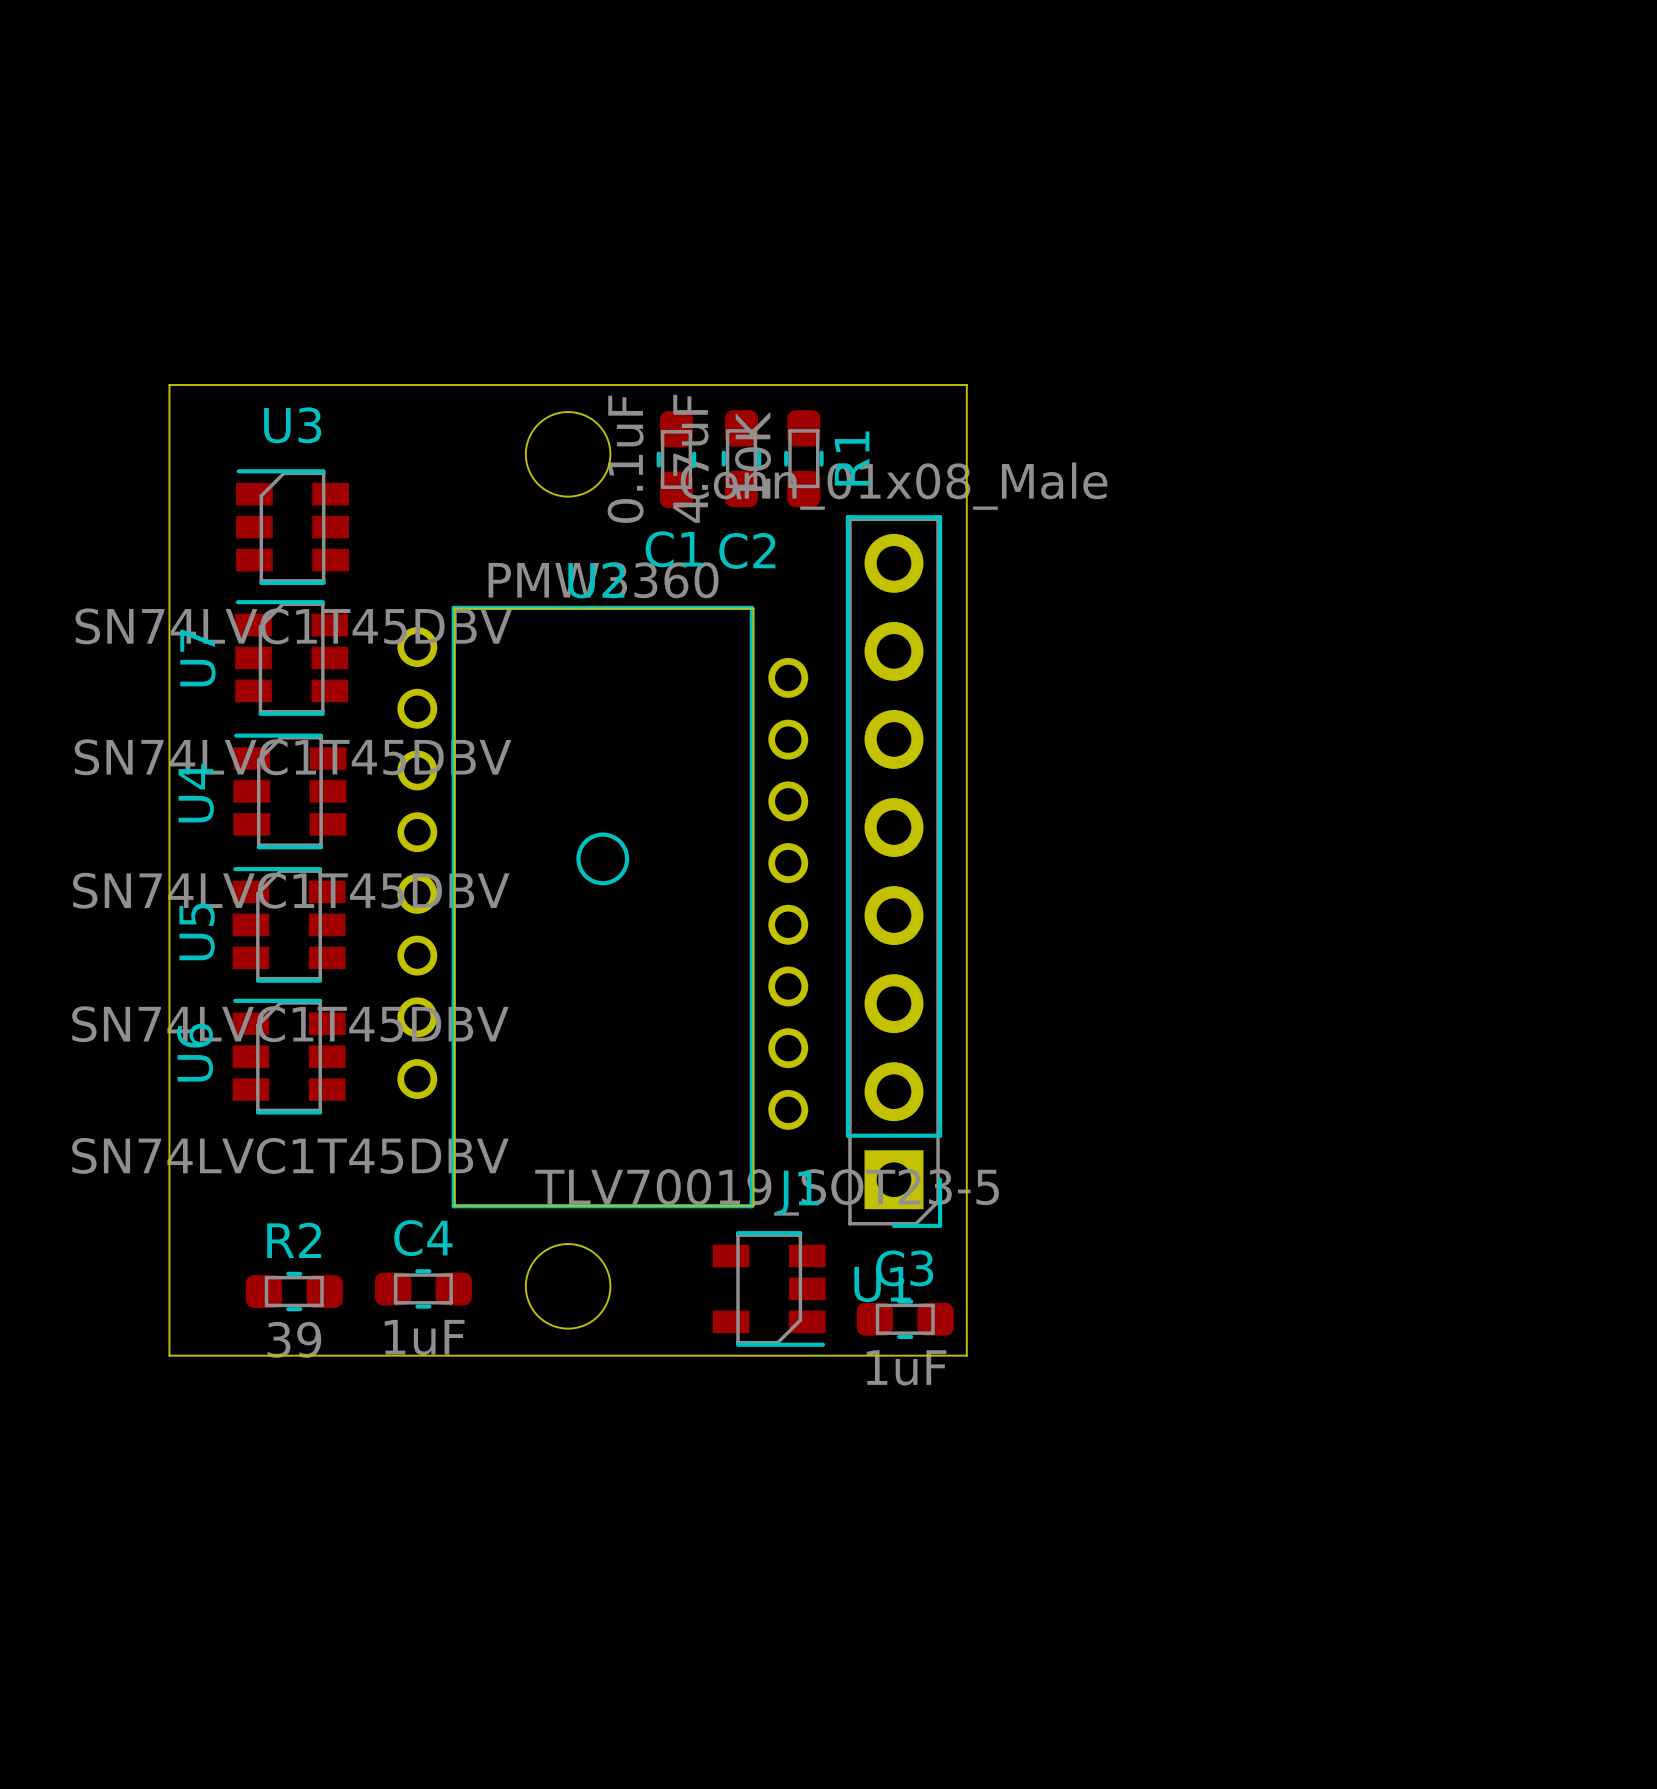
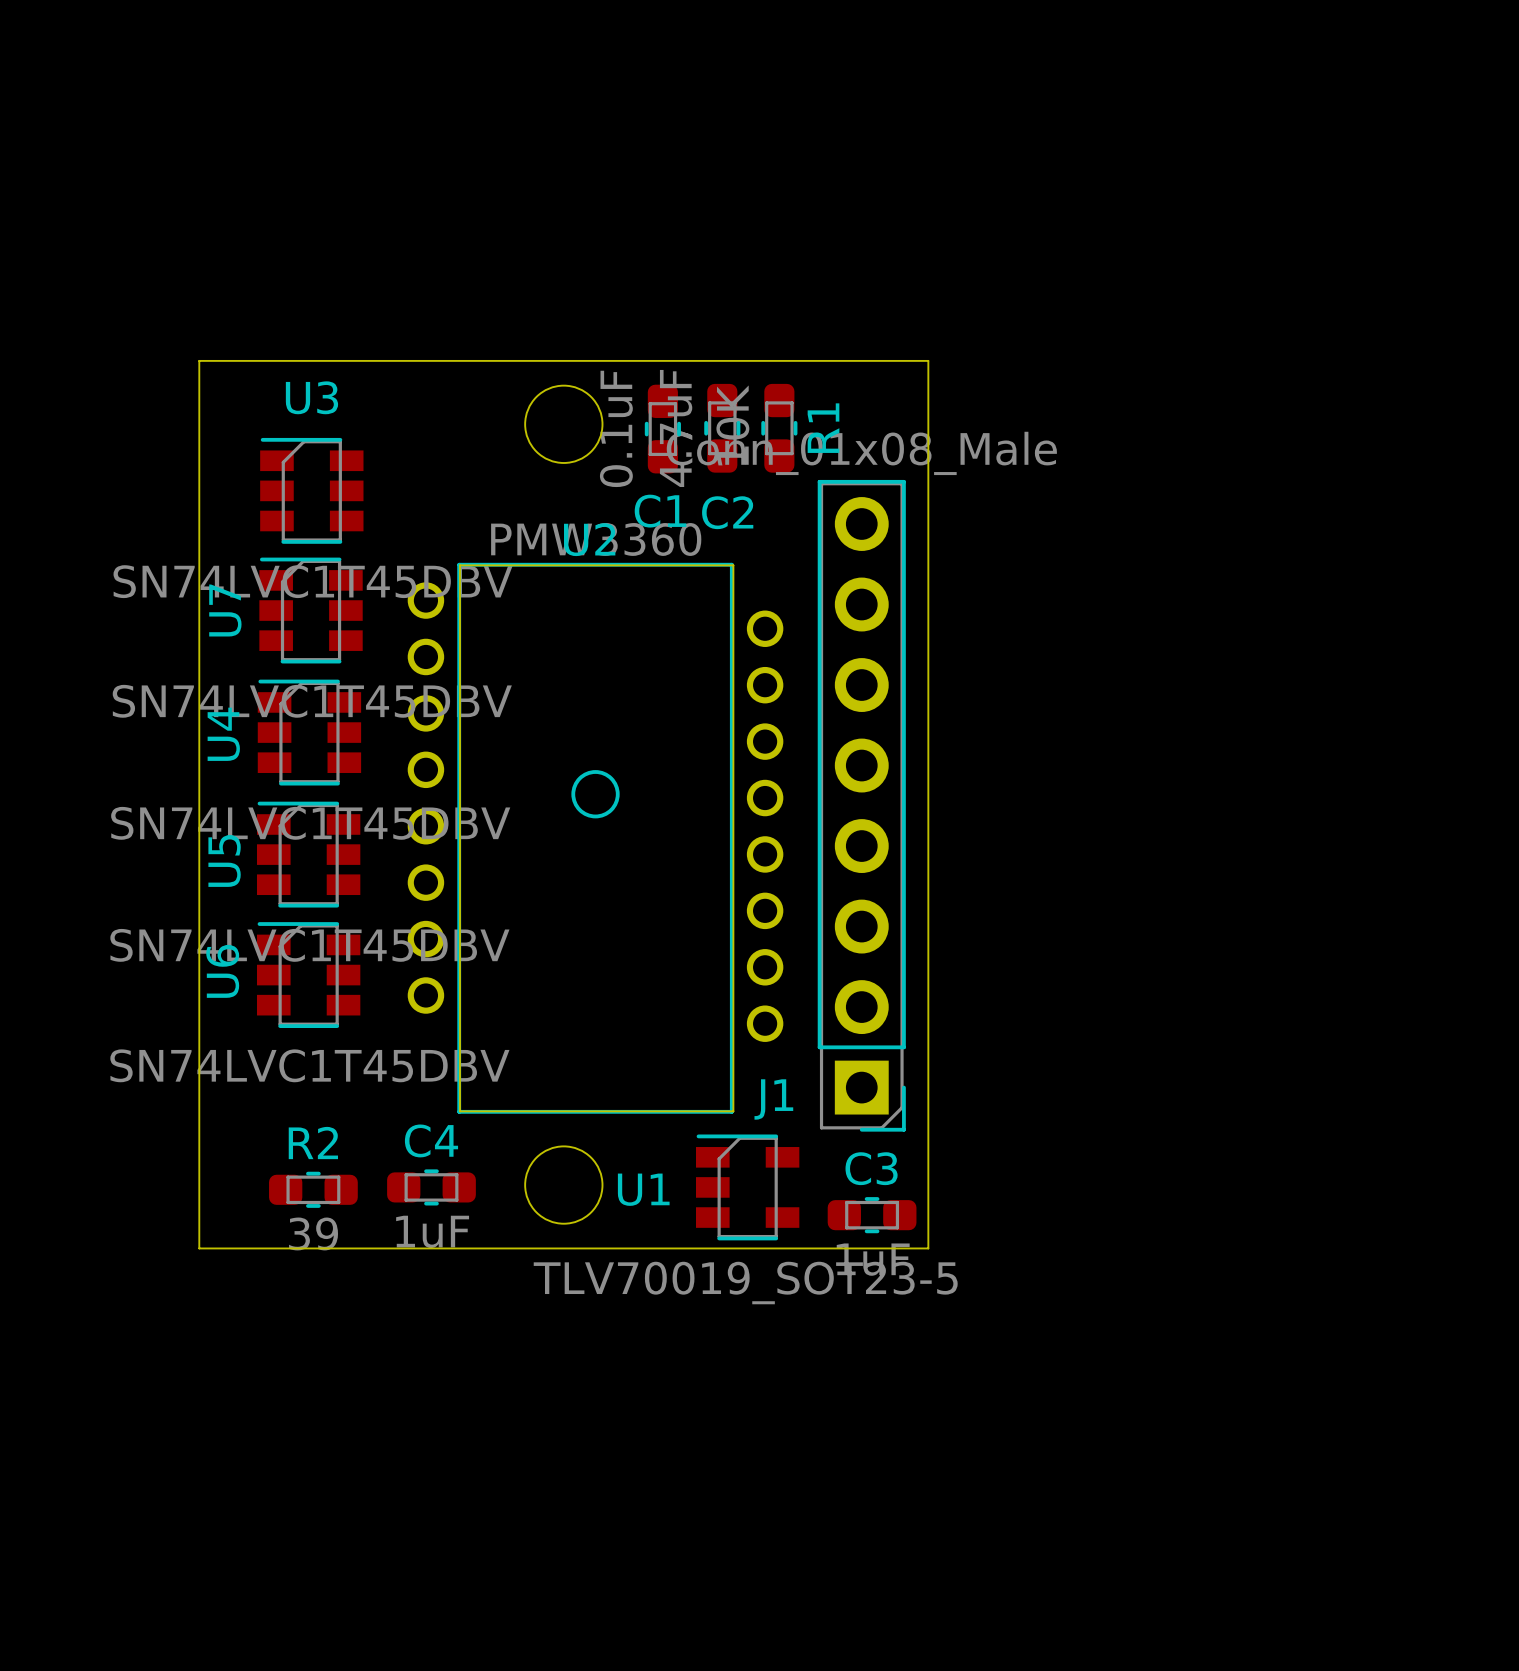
U1 rotation: 0° (769, 1288) -> 180° (747, 1187)

